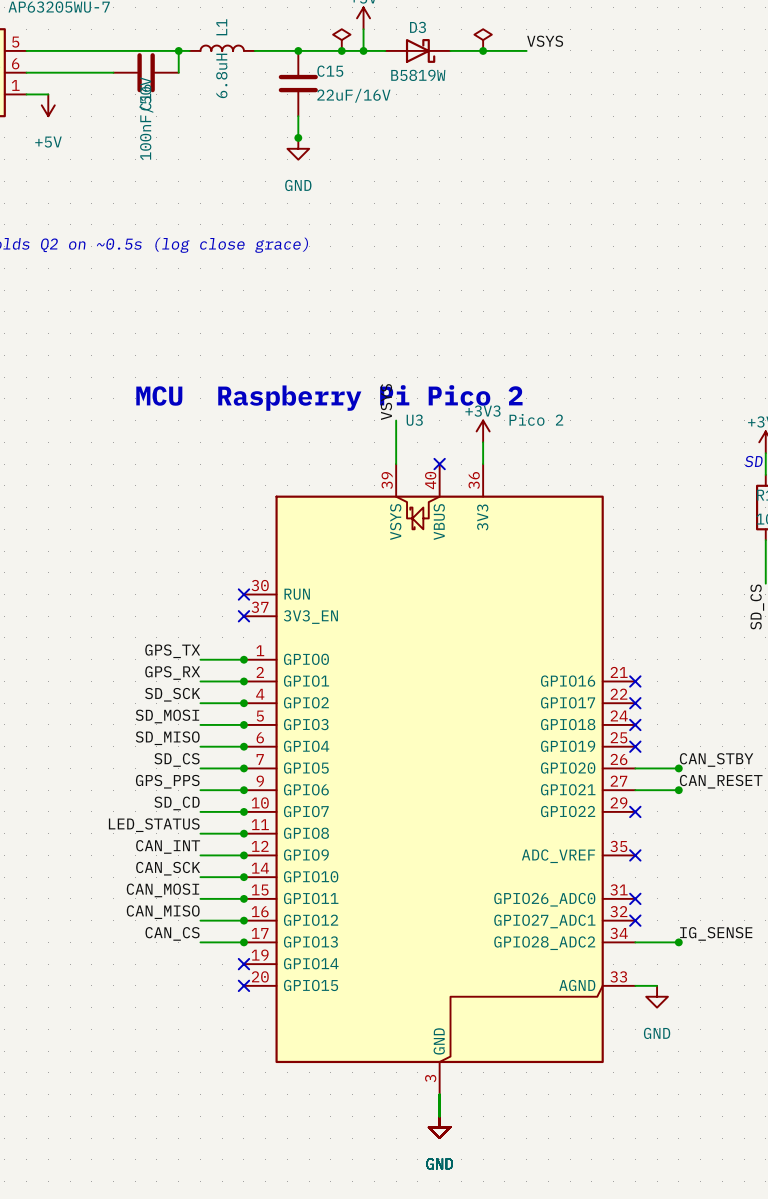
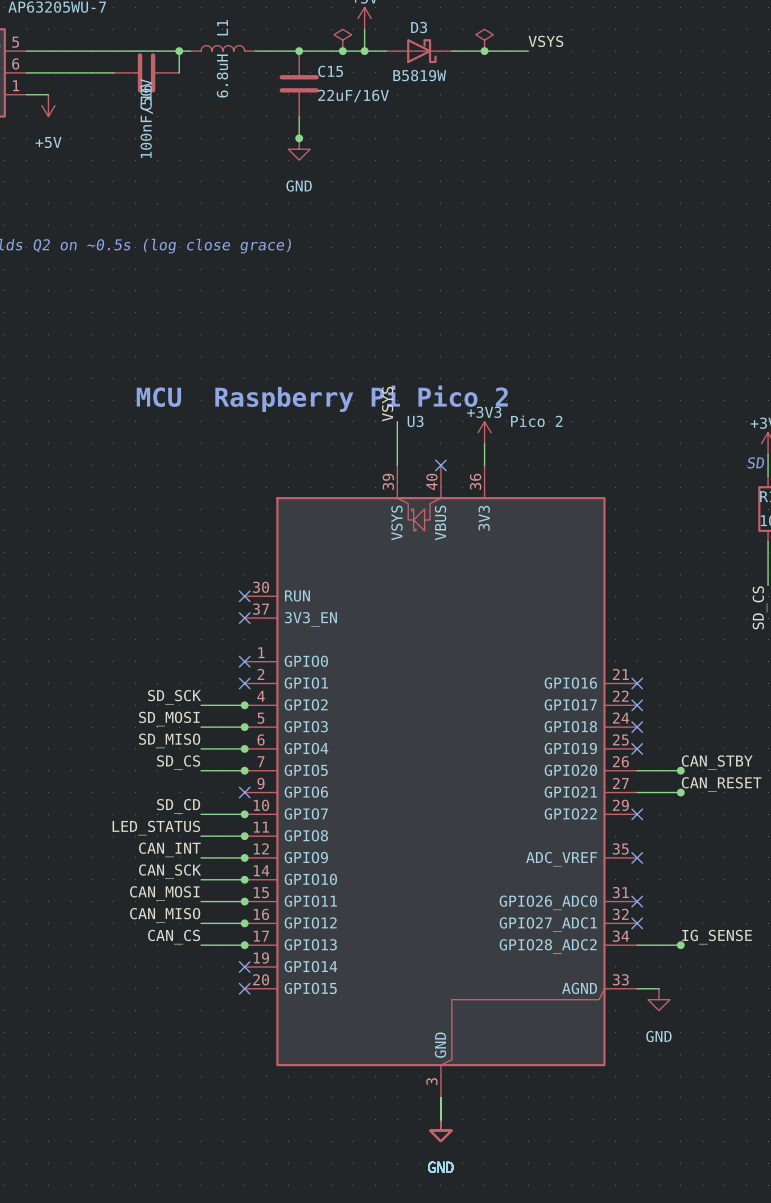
label: GPS_TX (172, 651) -> none
wire: (200, 659) (243, 659) -> none
junction: (243, 659) -> none
no-connect mark: none -> (244, 661)
label: GPS_RX (172, 673) -> none
wire: (200, 681) (243, 681) -> none
junction: (243, 681) -> none
no-connect mark: none -> (244, 683)
label: GPS_PPS (167, 781) -> none
wire: (200, 790) (243, 790) -> none
junction: (243, 790) -> none
no-connect mark: none -> (244, 792)

